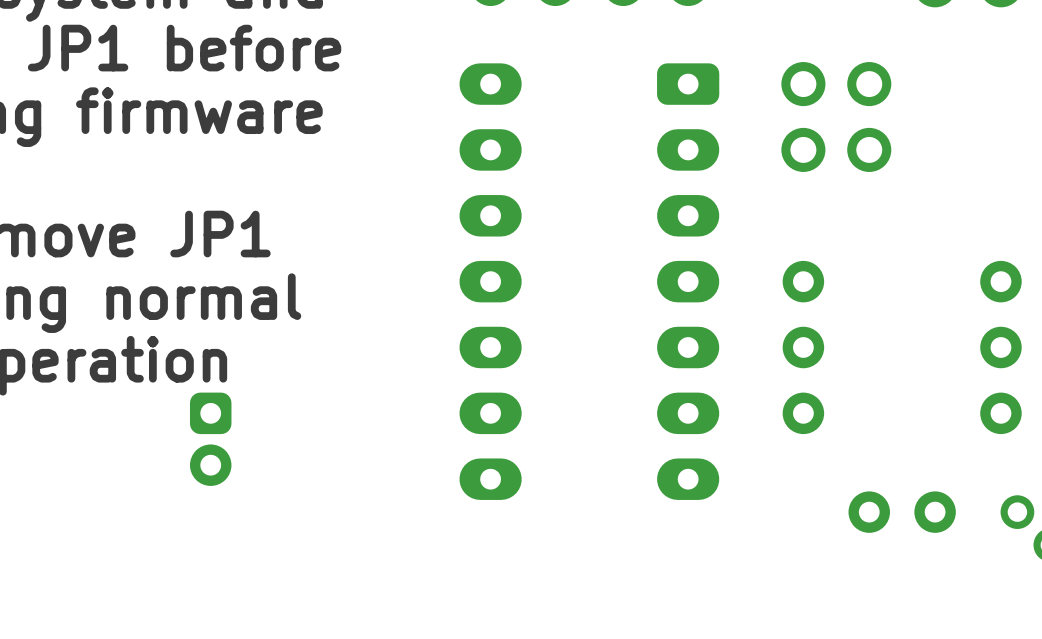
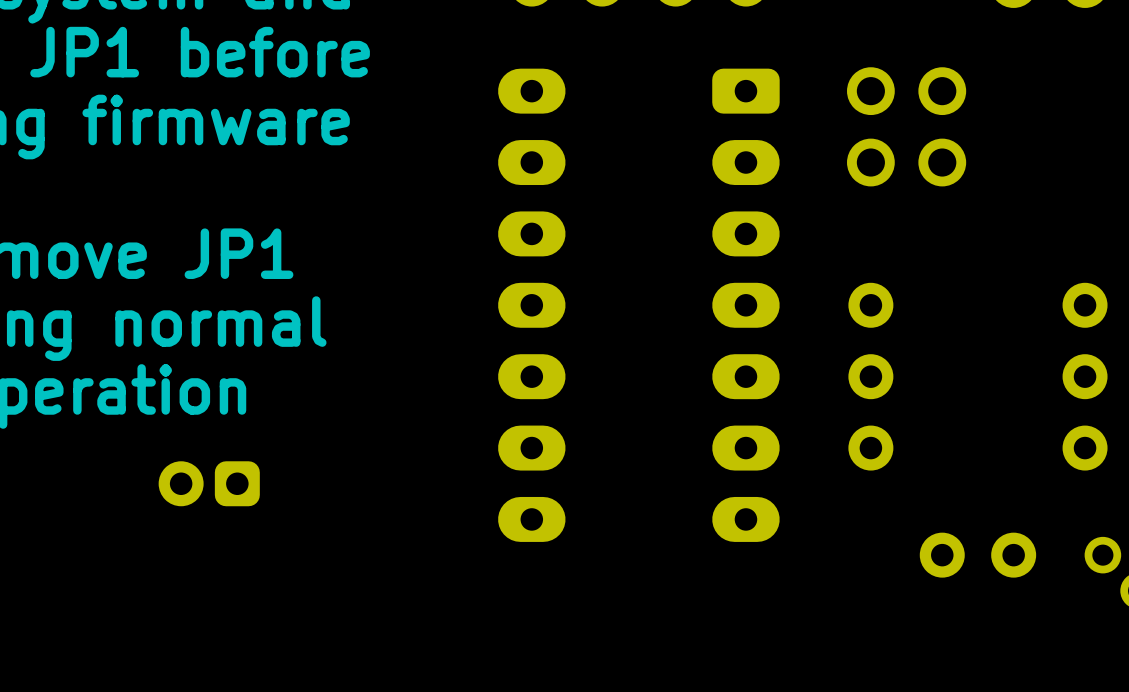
part rotation: 0° (210, 439) -> 90° clockwise (209, 483)

